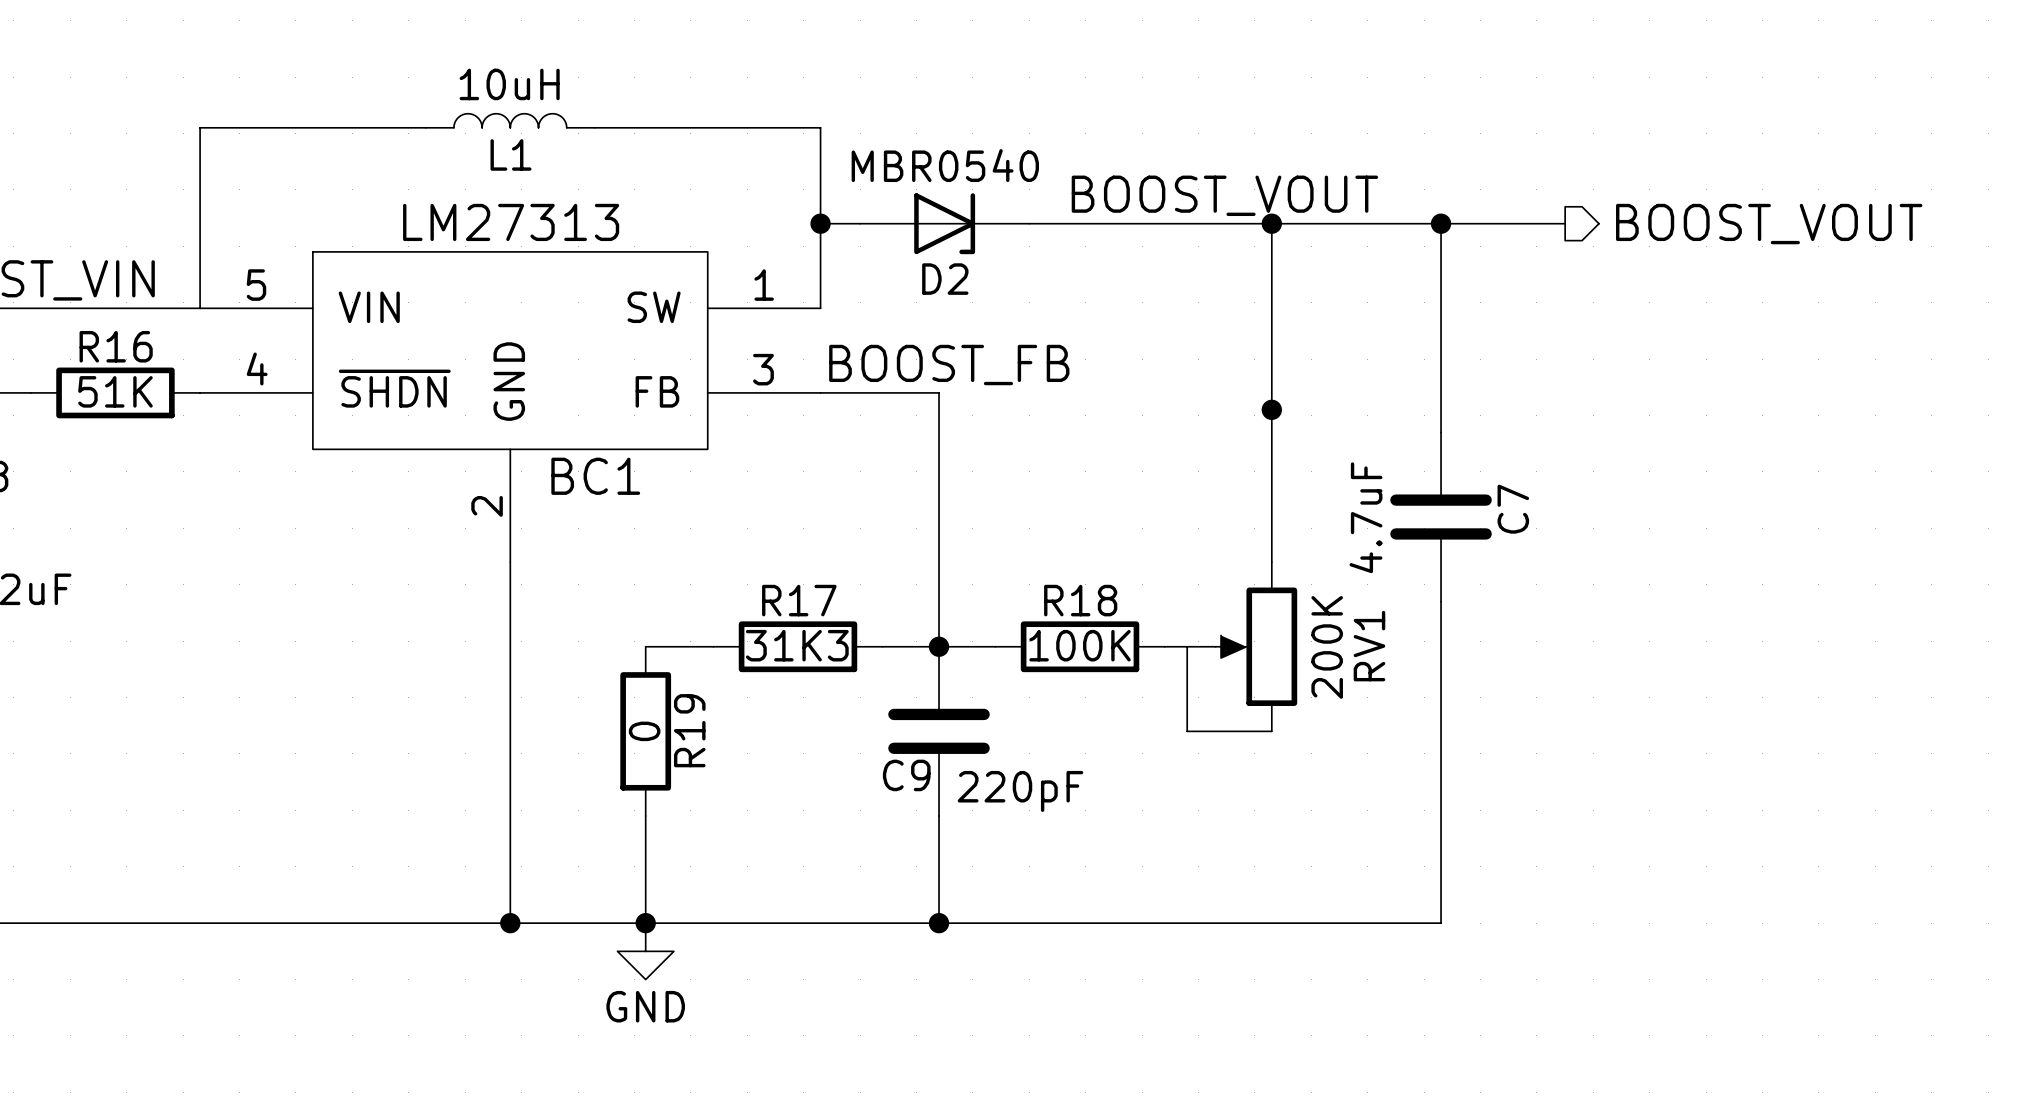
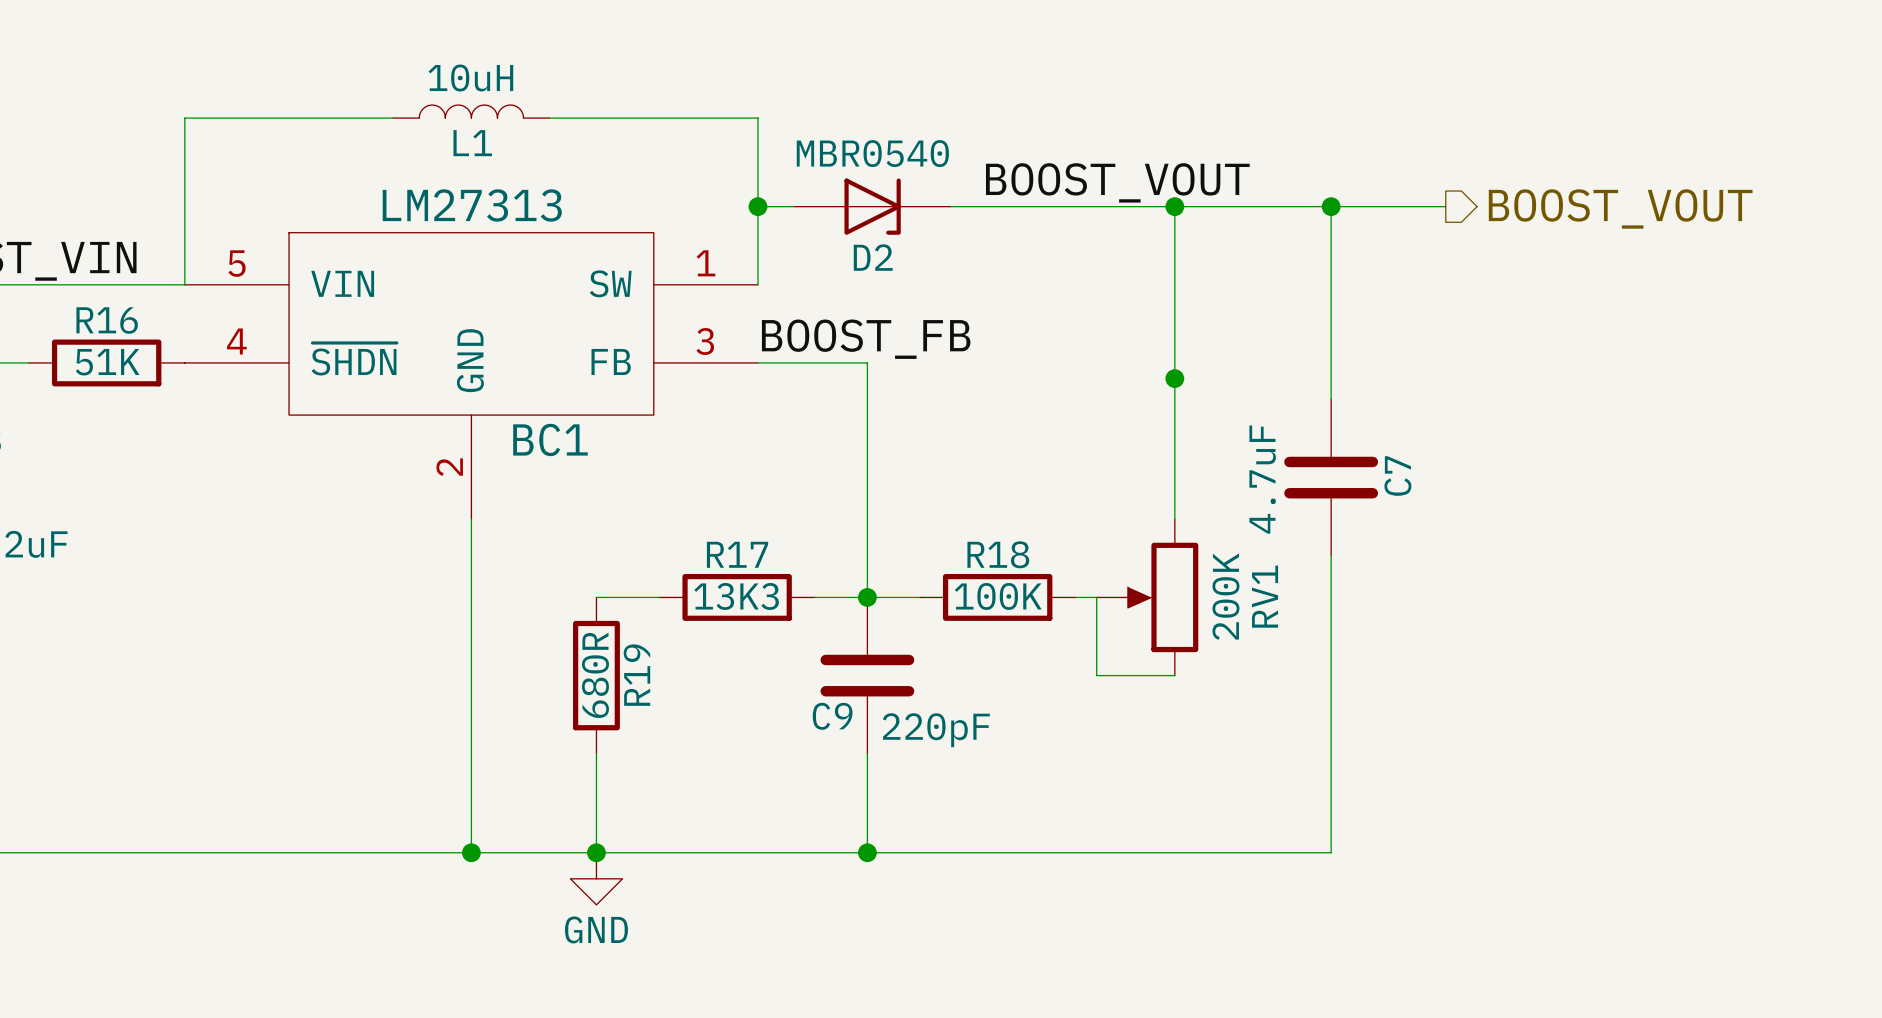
R17 value: 31K3 (797, 645) -> 13K3 (736, 596)
R19 value: 0 (644, 731) -> 680R (595, 675)

